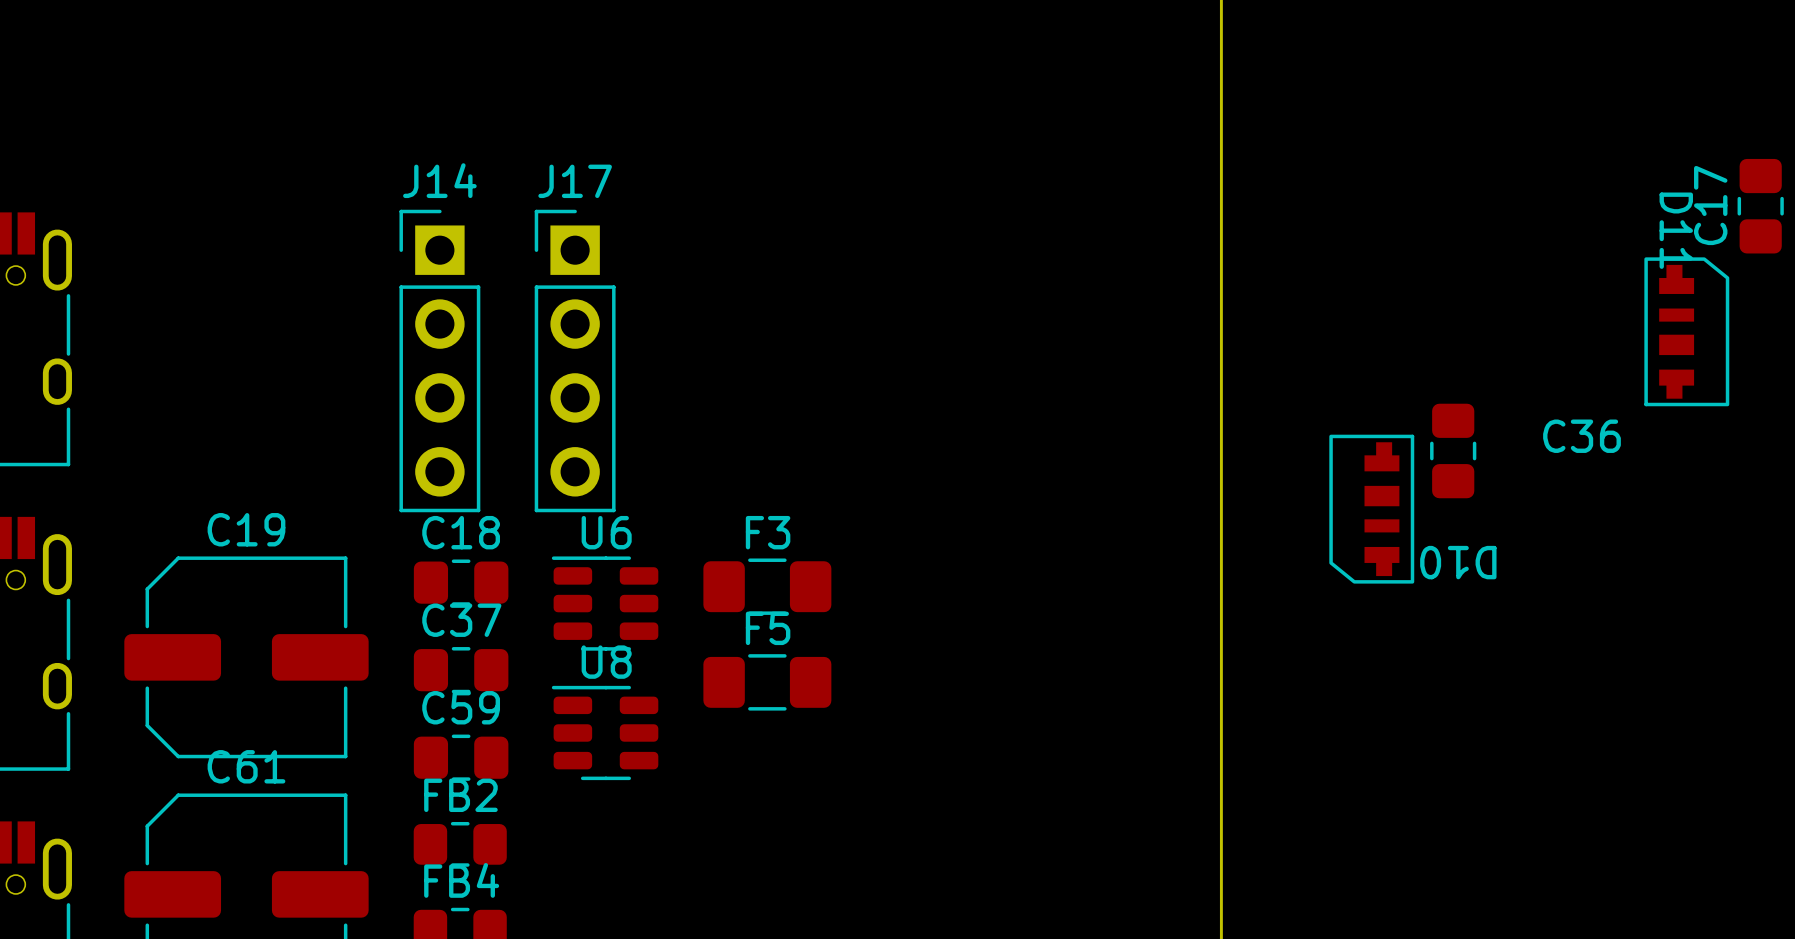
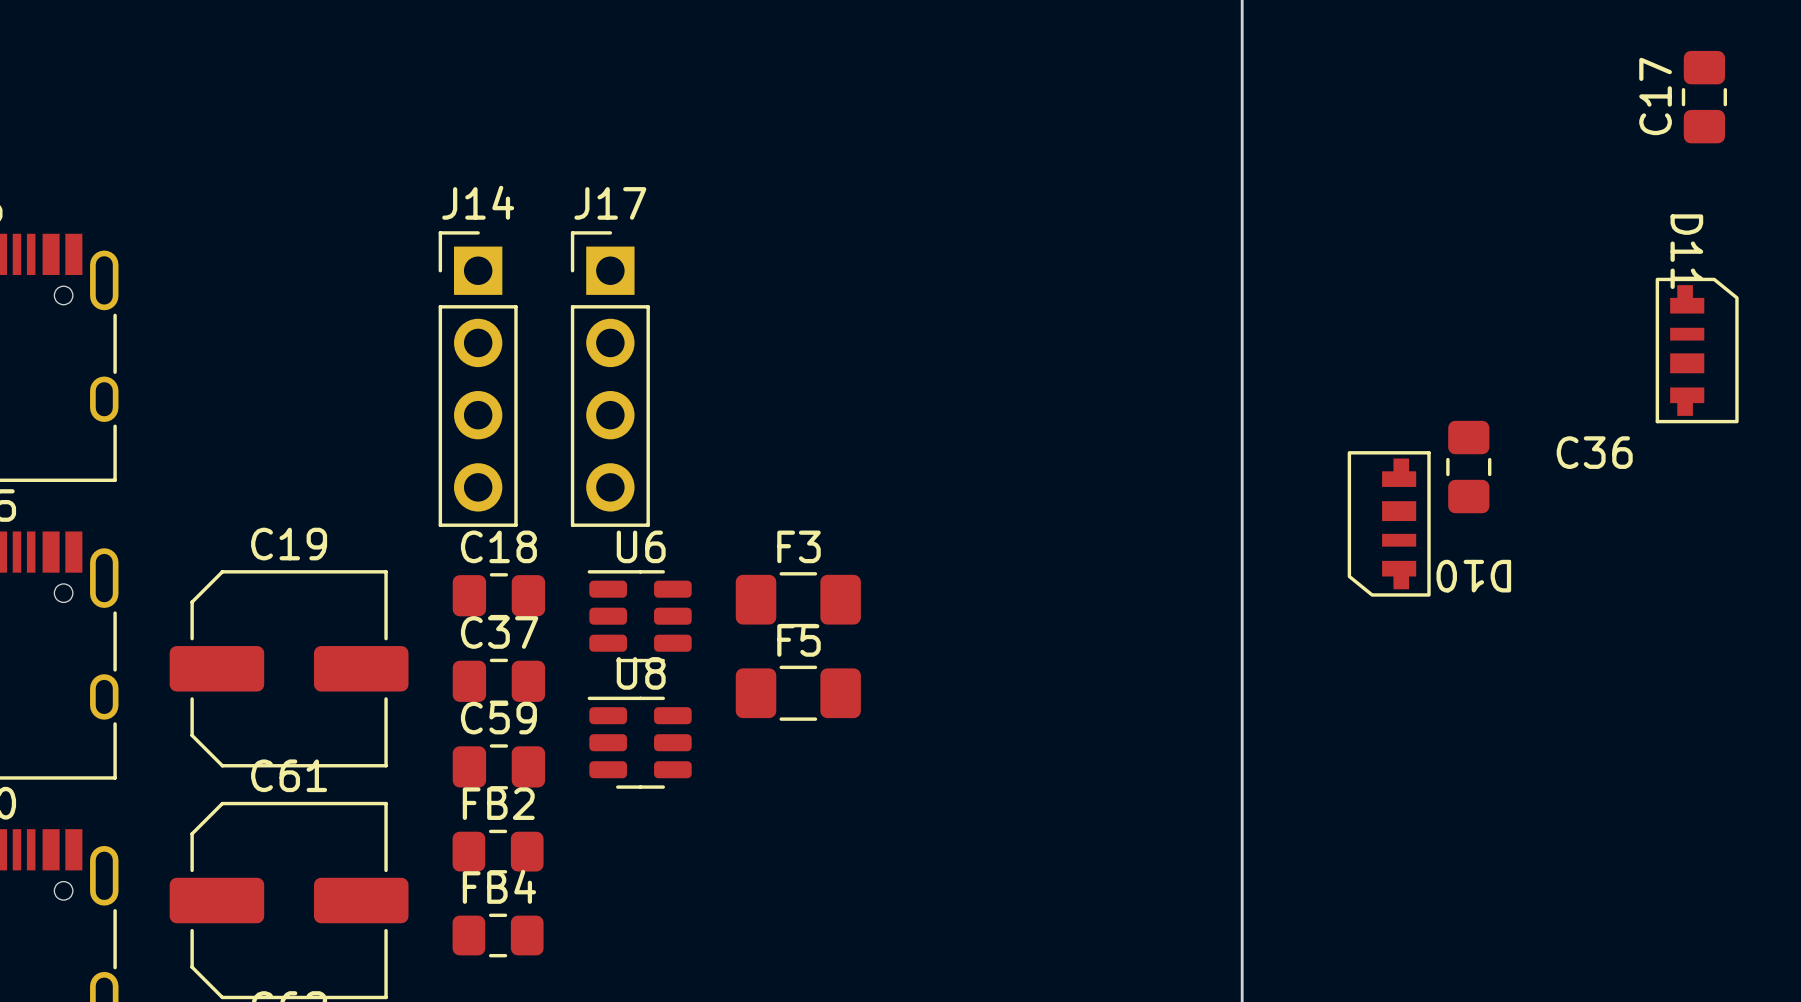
C17 position: (1760, 206) -> (1704, 97)

